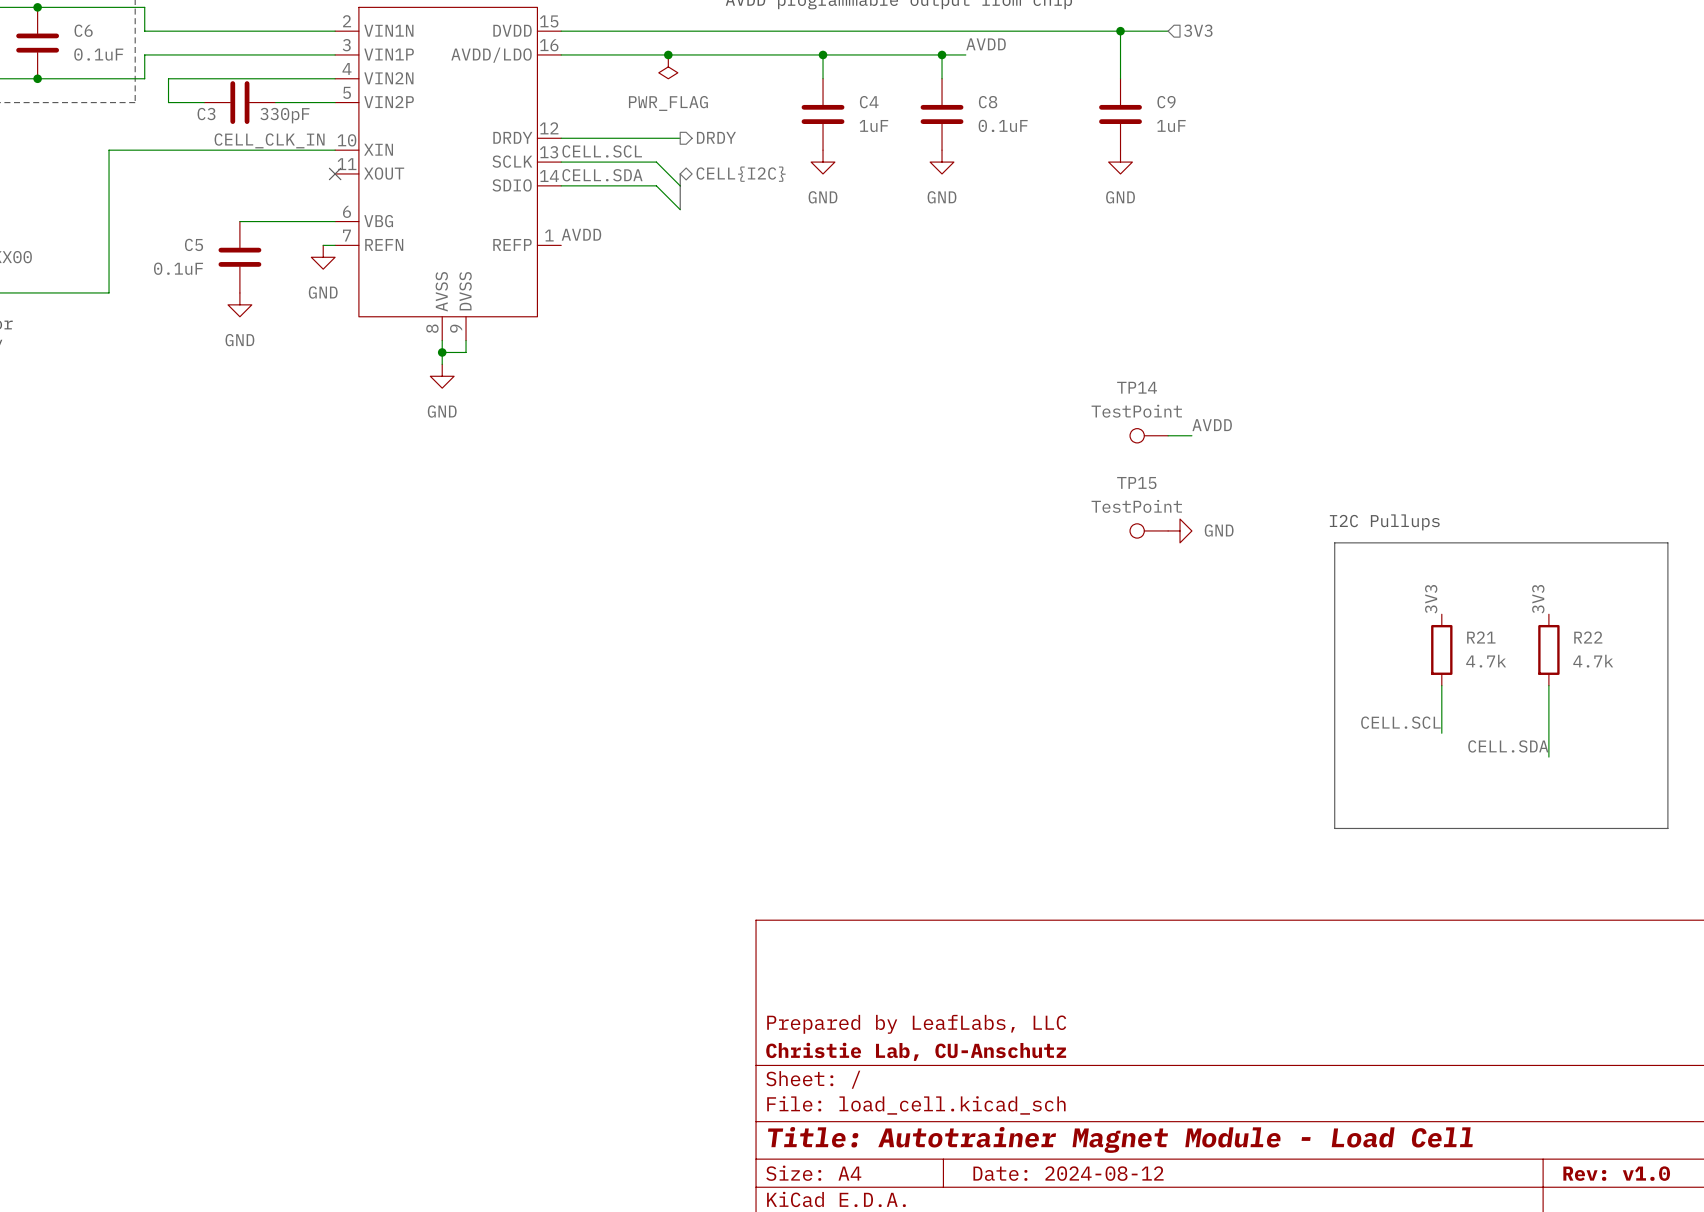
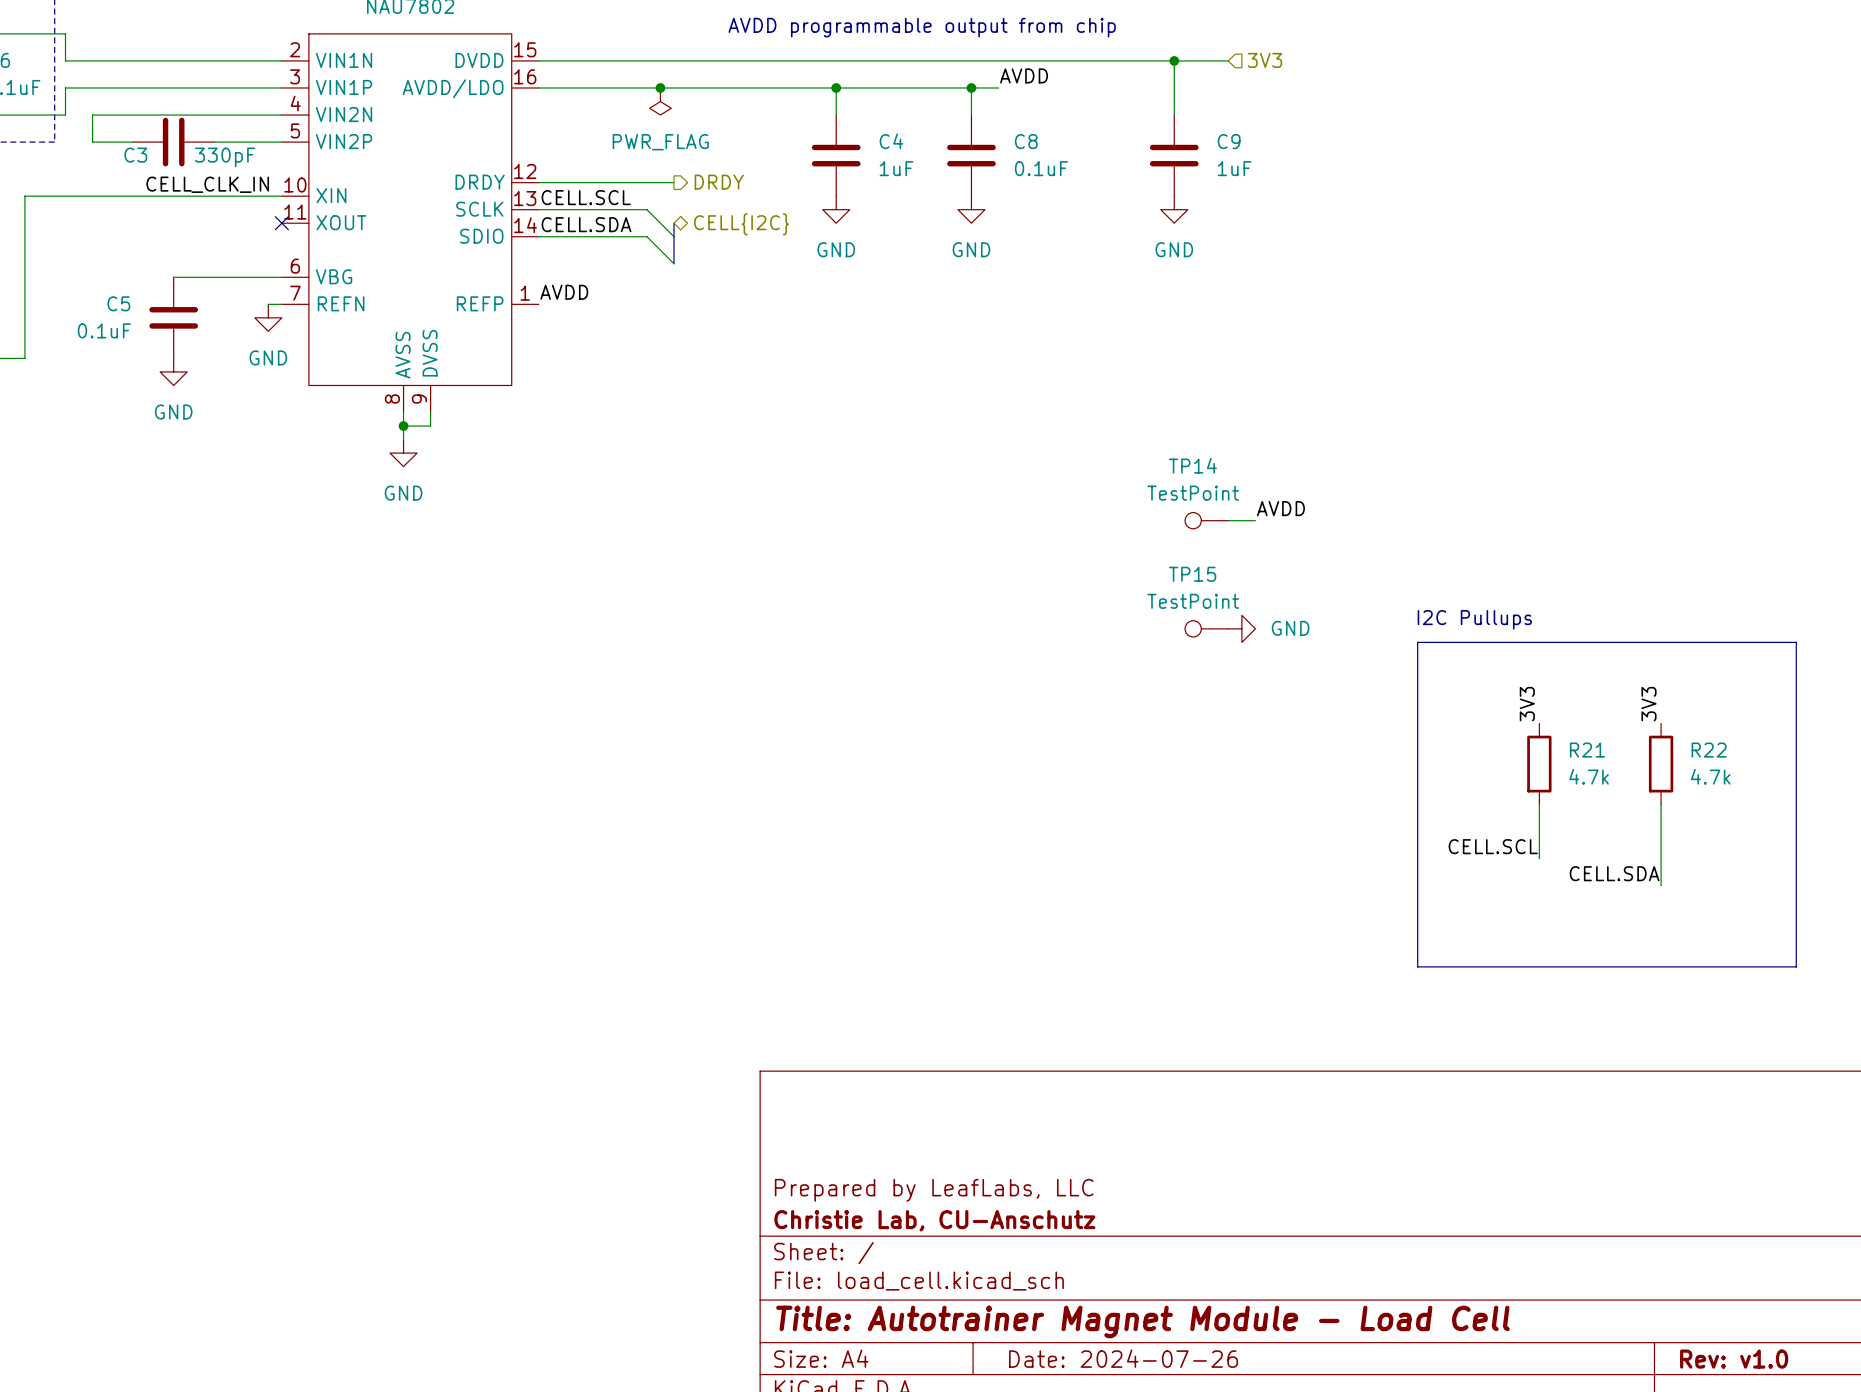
title block: Date: 2024-08-12 (1068, 1173) -> Date: 2024-07-26 (1123, 1358)

